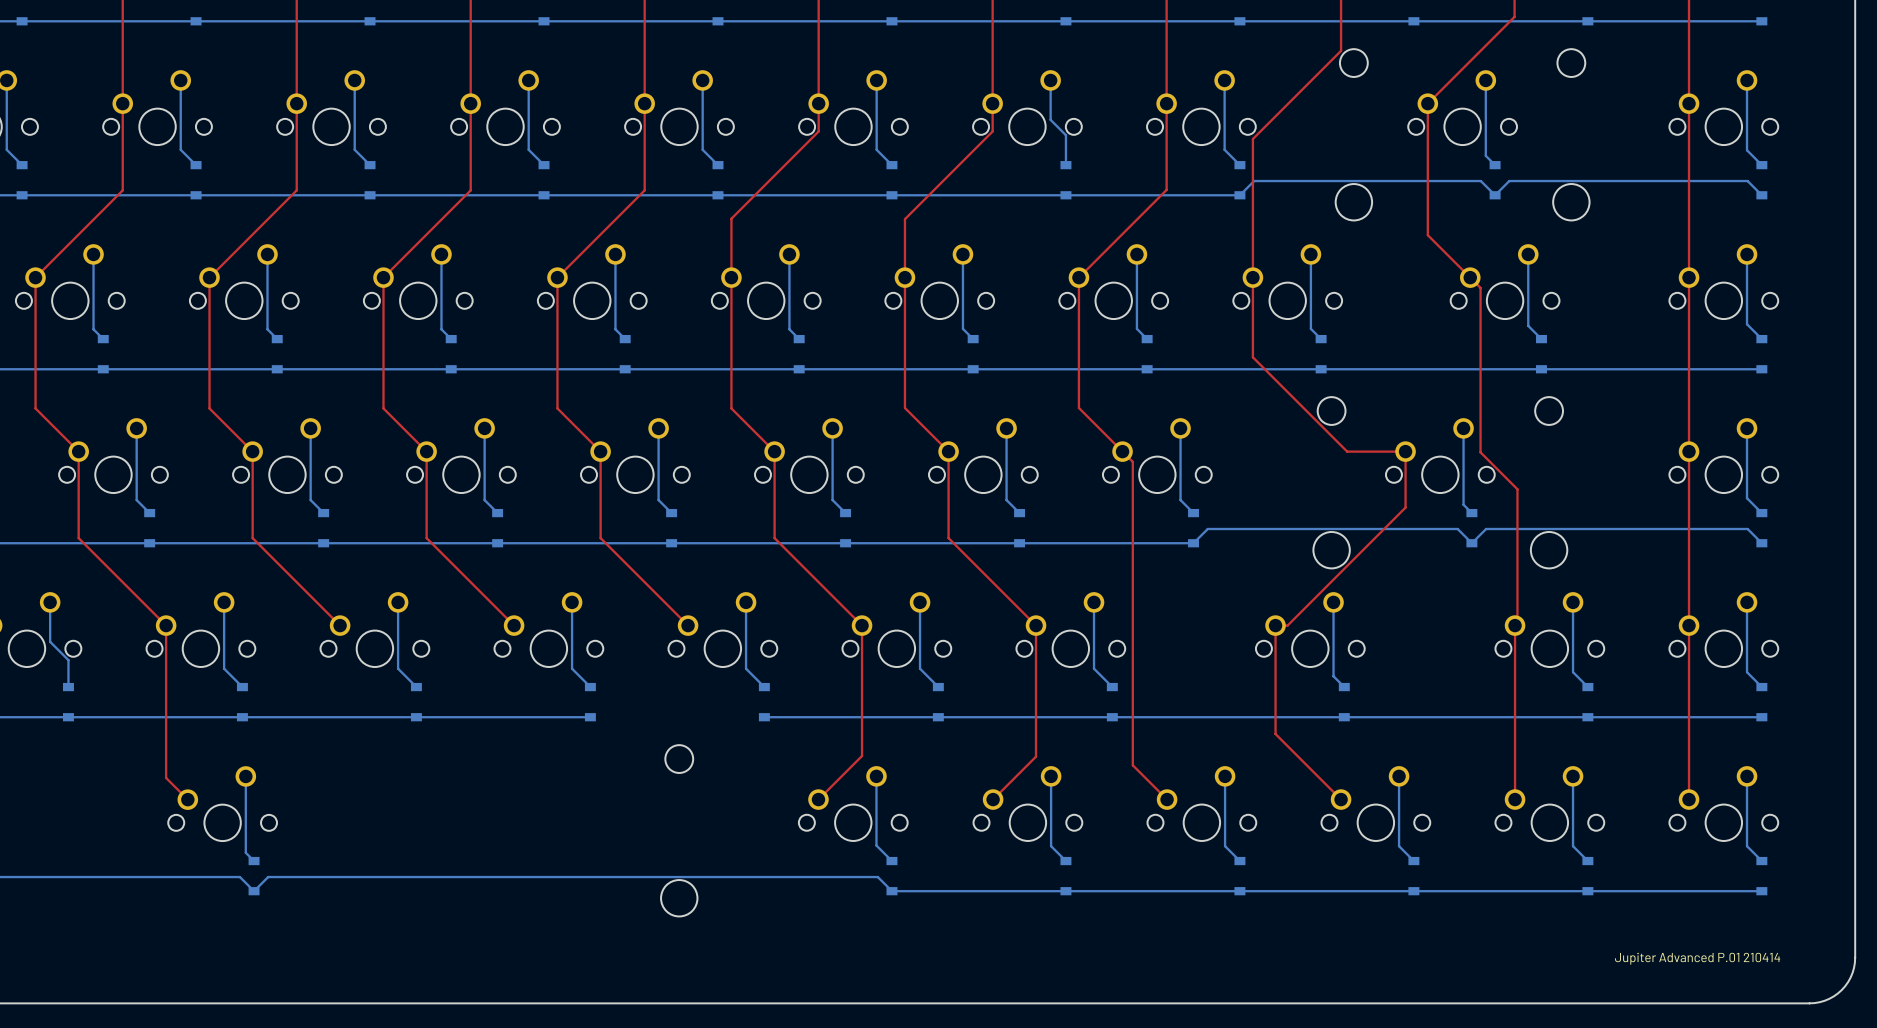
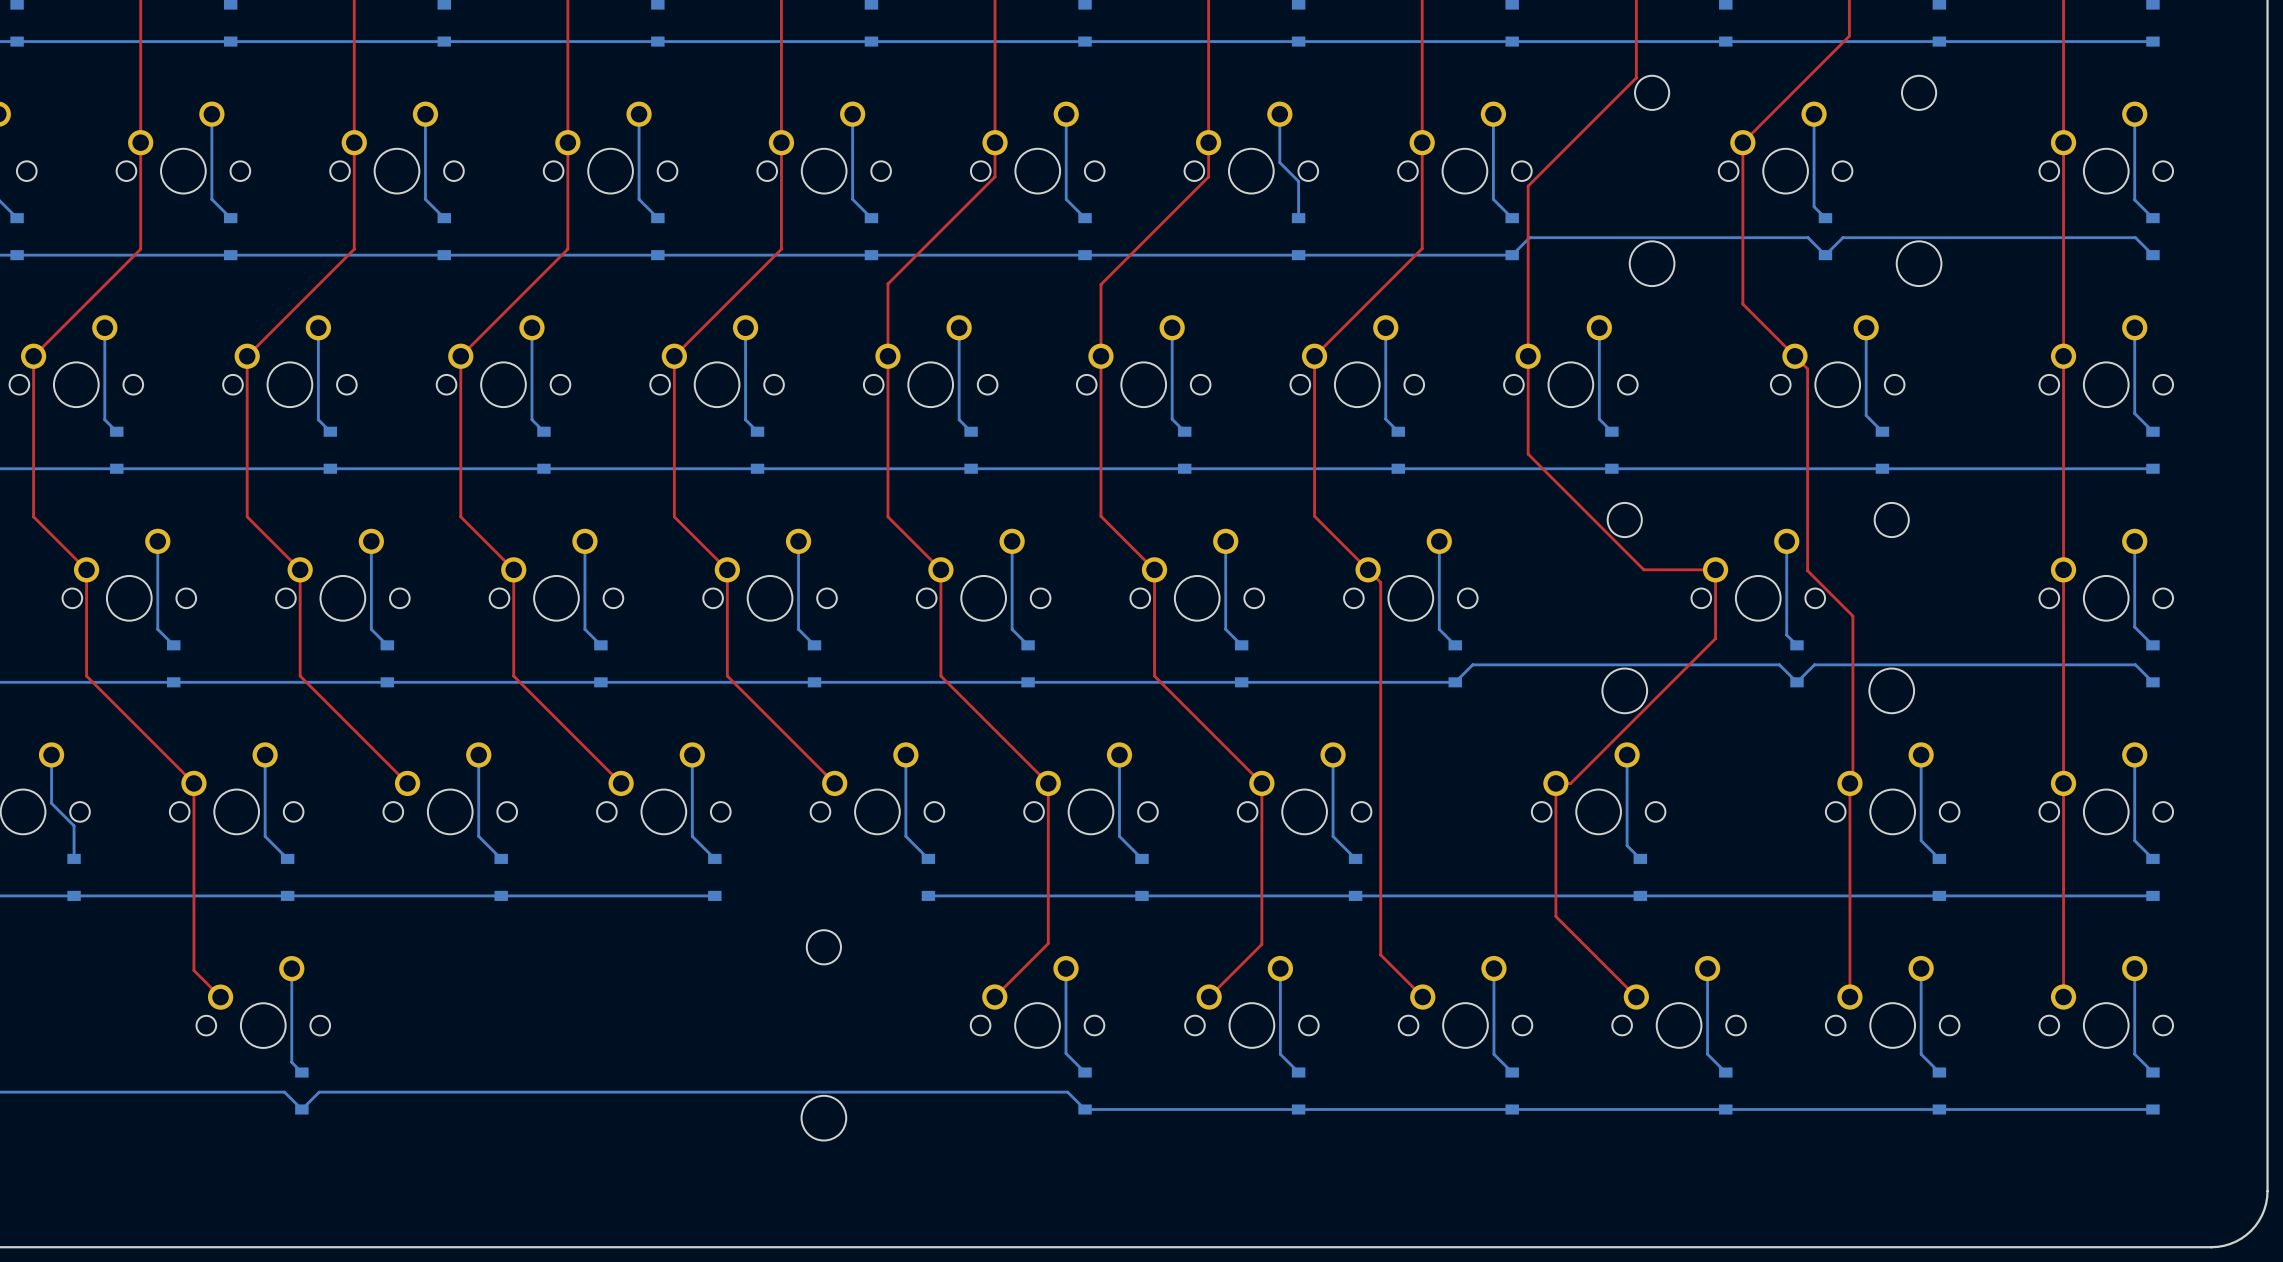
text: Jupiter Advanced P.01 210414 (1697, 958) -> none

